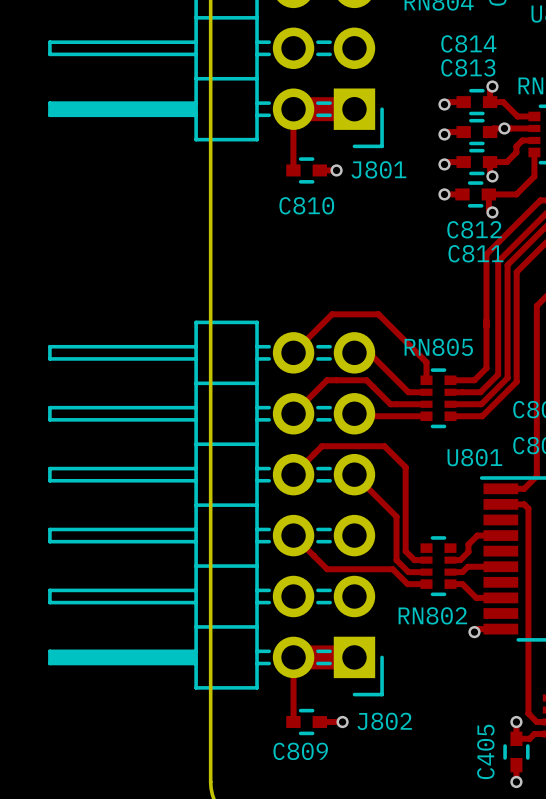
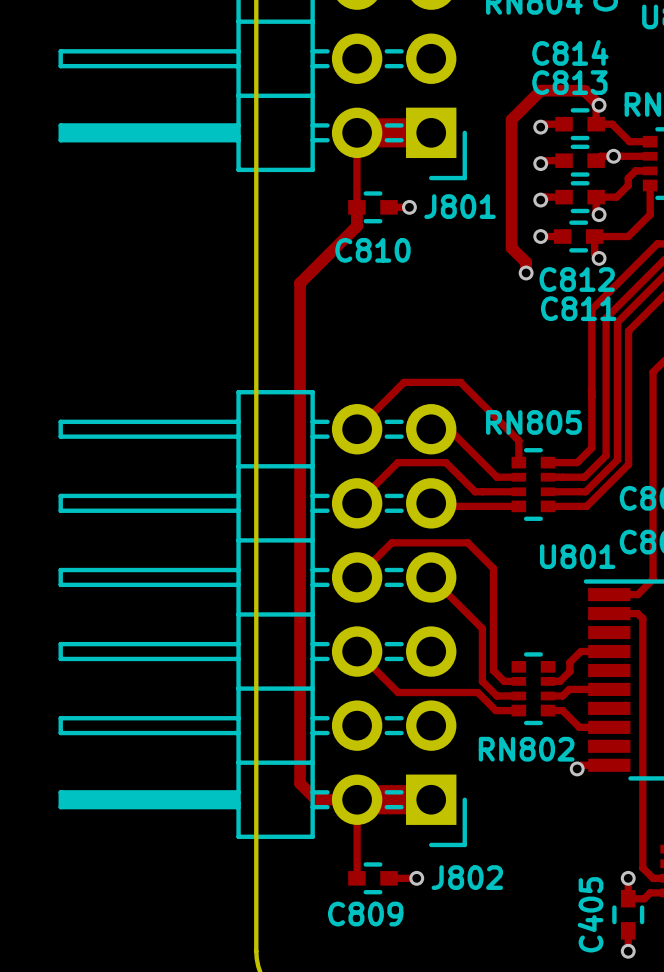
track: none -> (599, 105) (584, 90) (540, 90) (511, 119) (511, 247) (526, 262) (526, 272)
track: none -> (356, 207) (356, 226) (300, 283) (300, 783) (316, 799) (357, 799)
via: none -> (526, 272)

